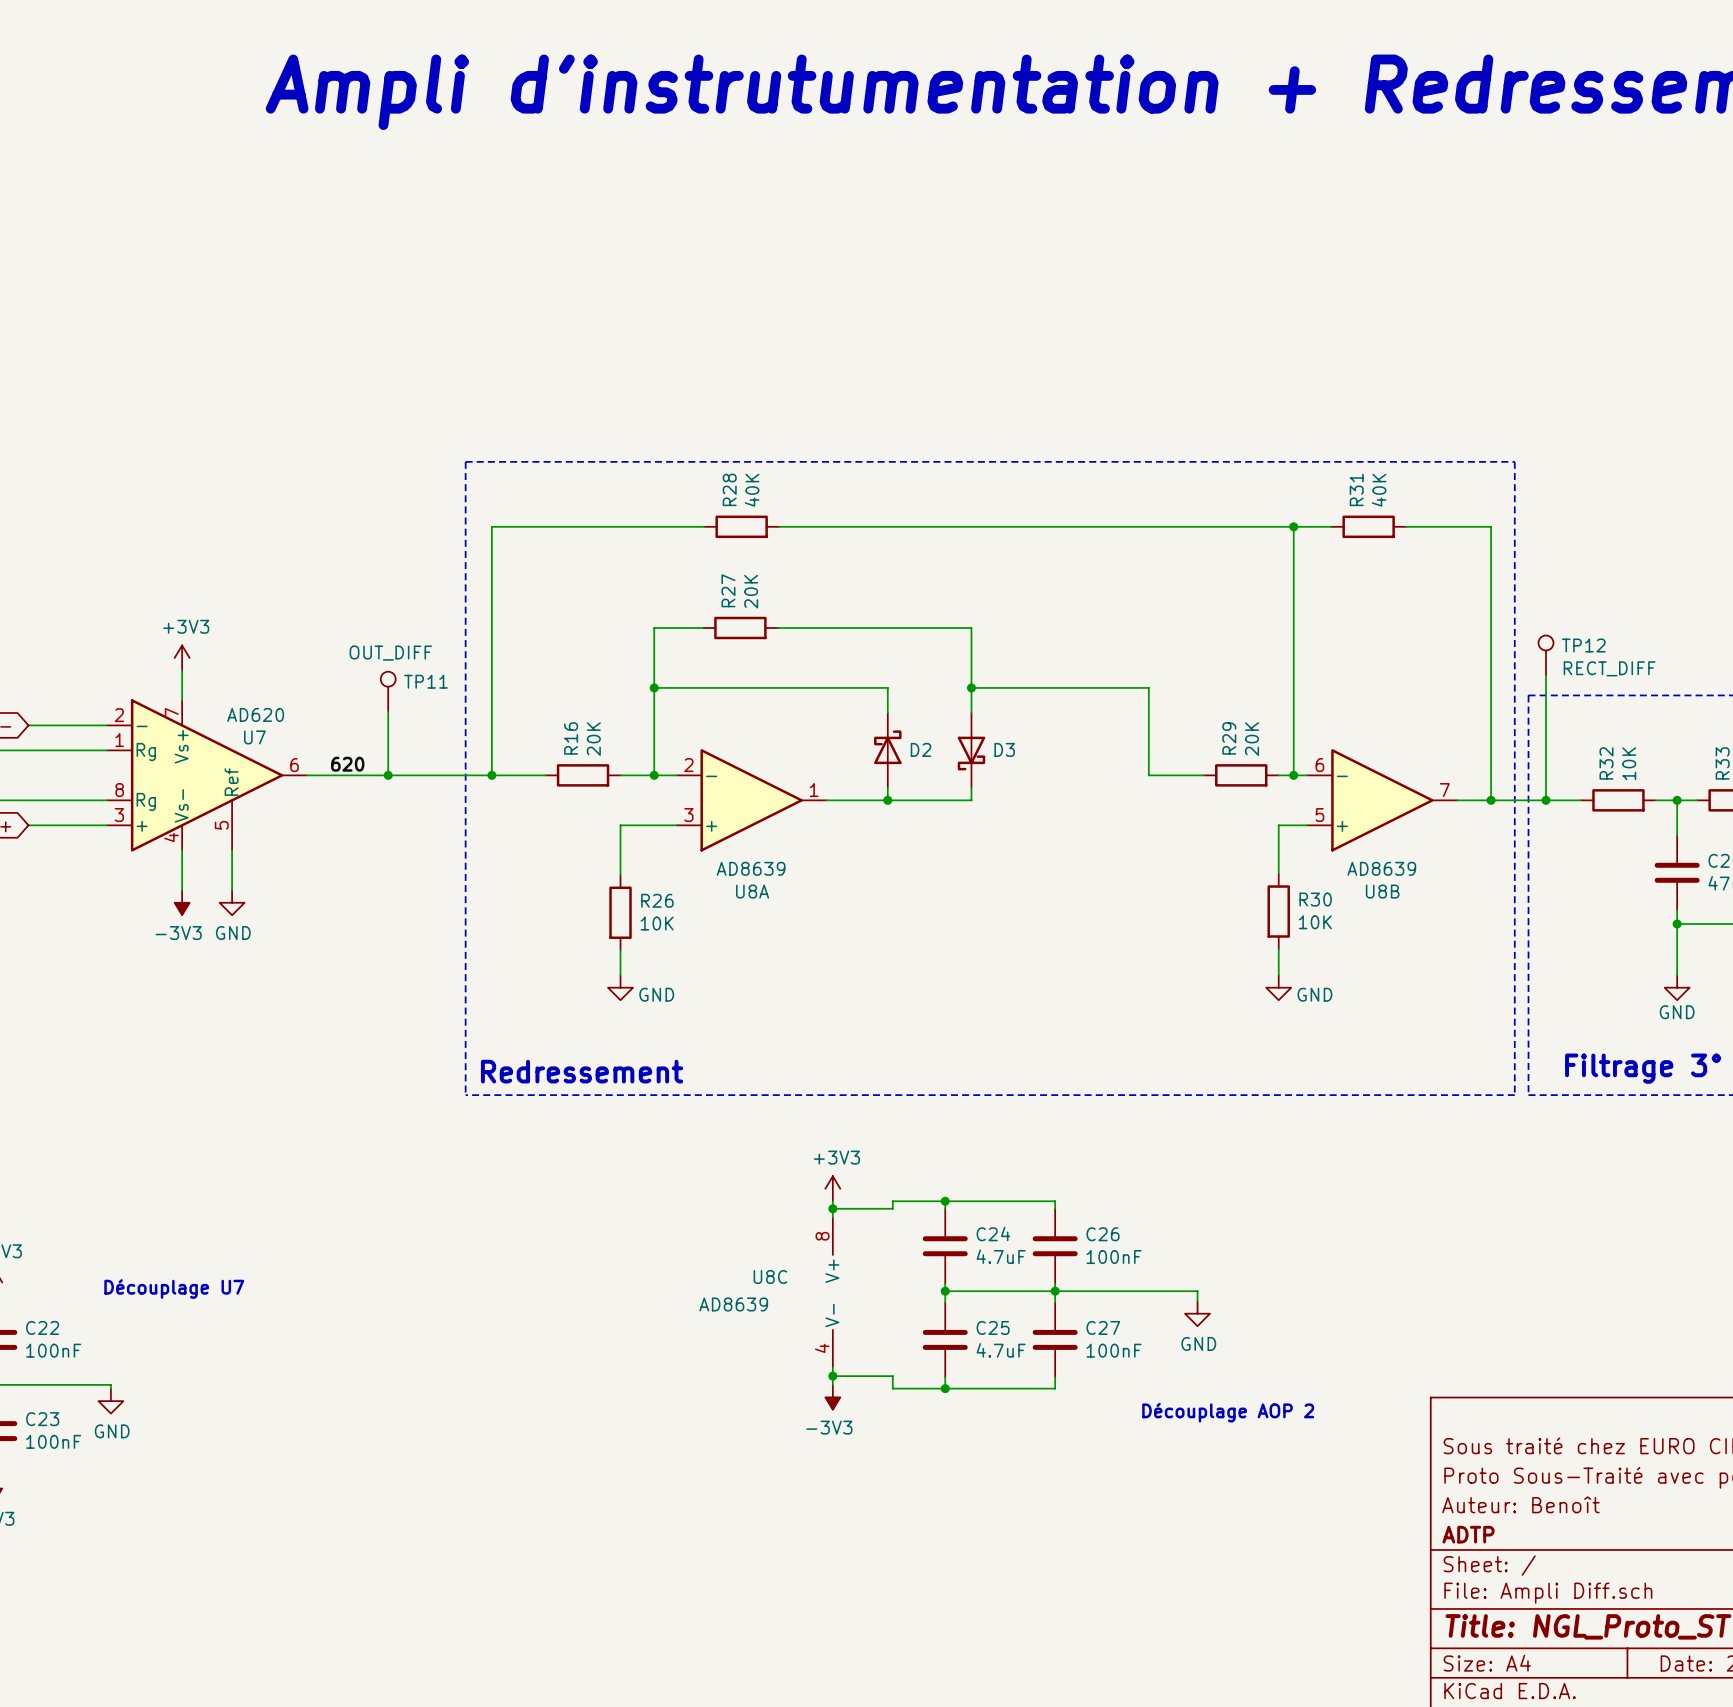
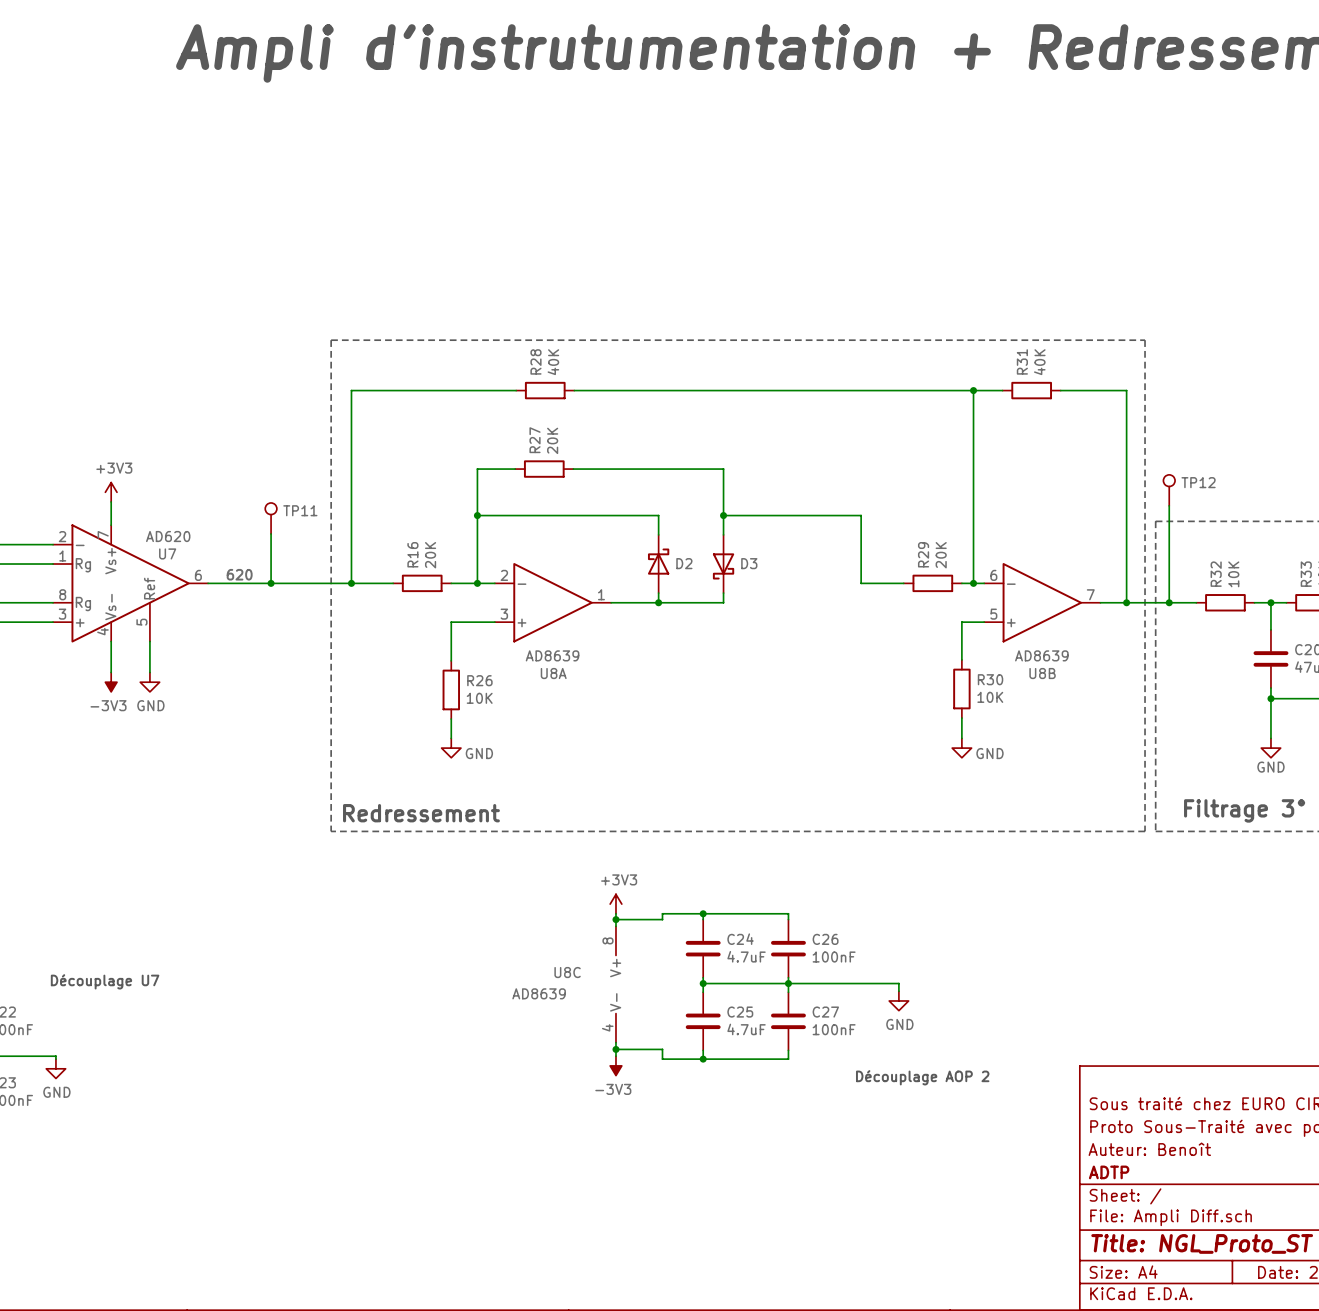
TP11 value: OUT_DIFF (390, 653) -> none
TP12 value: RECT_DIFF (1609, 668) -> none

